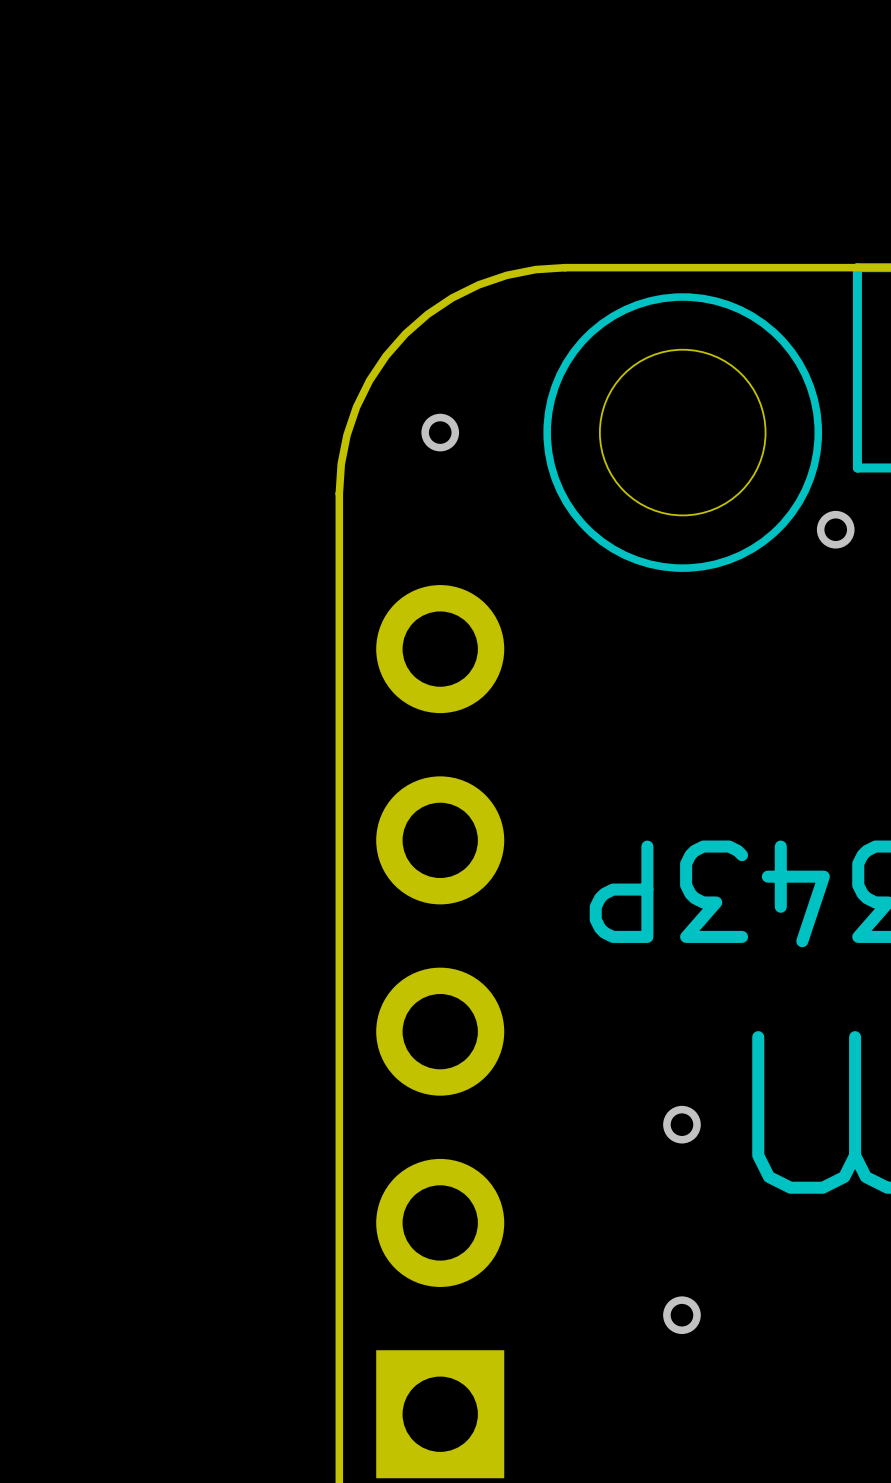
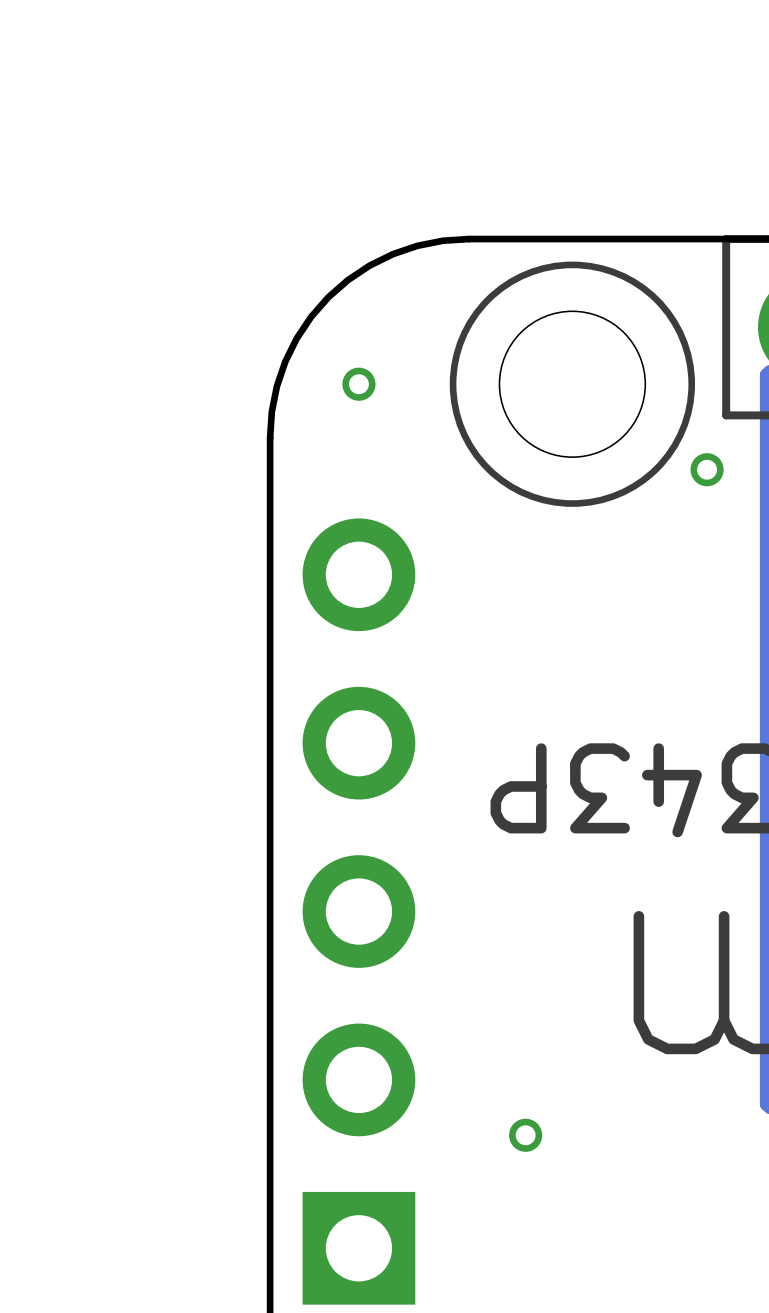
via: (681, 1124) -> none
via position: (681, 1315) -> (525, 1135)

